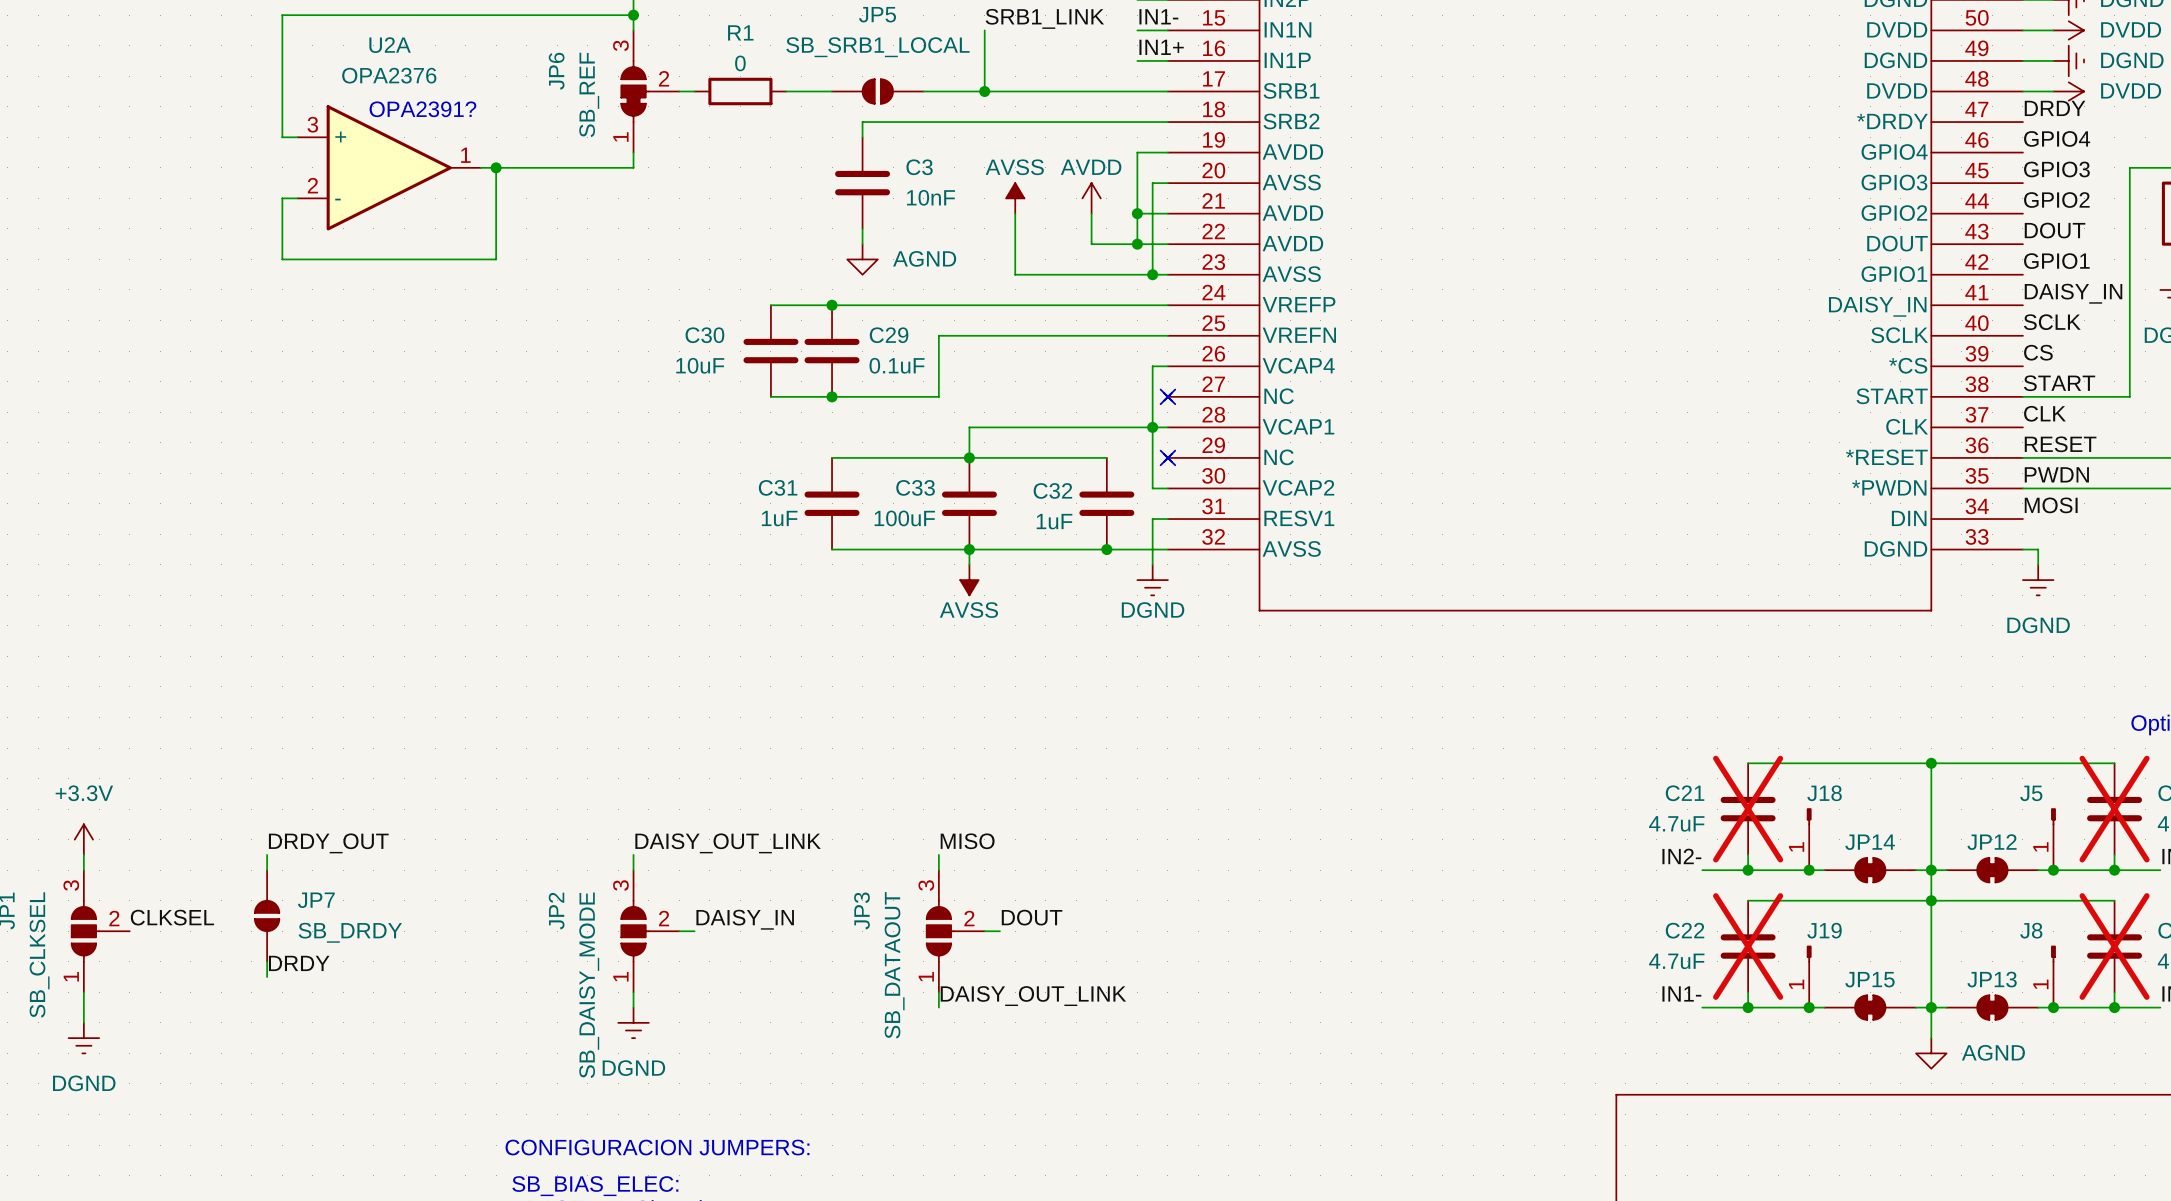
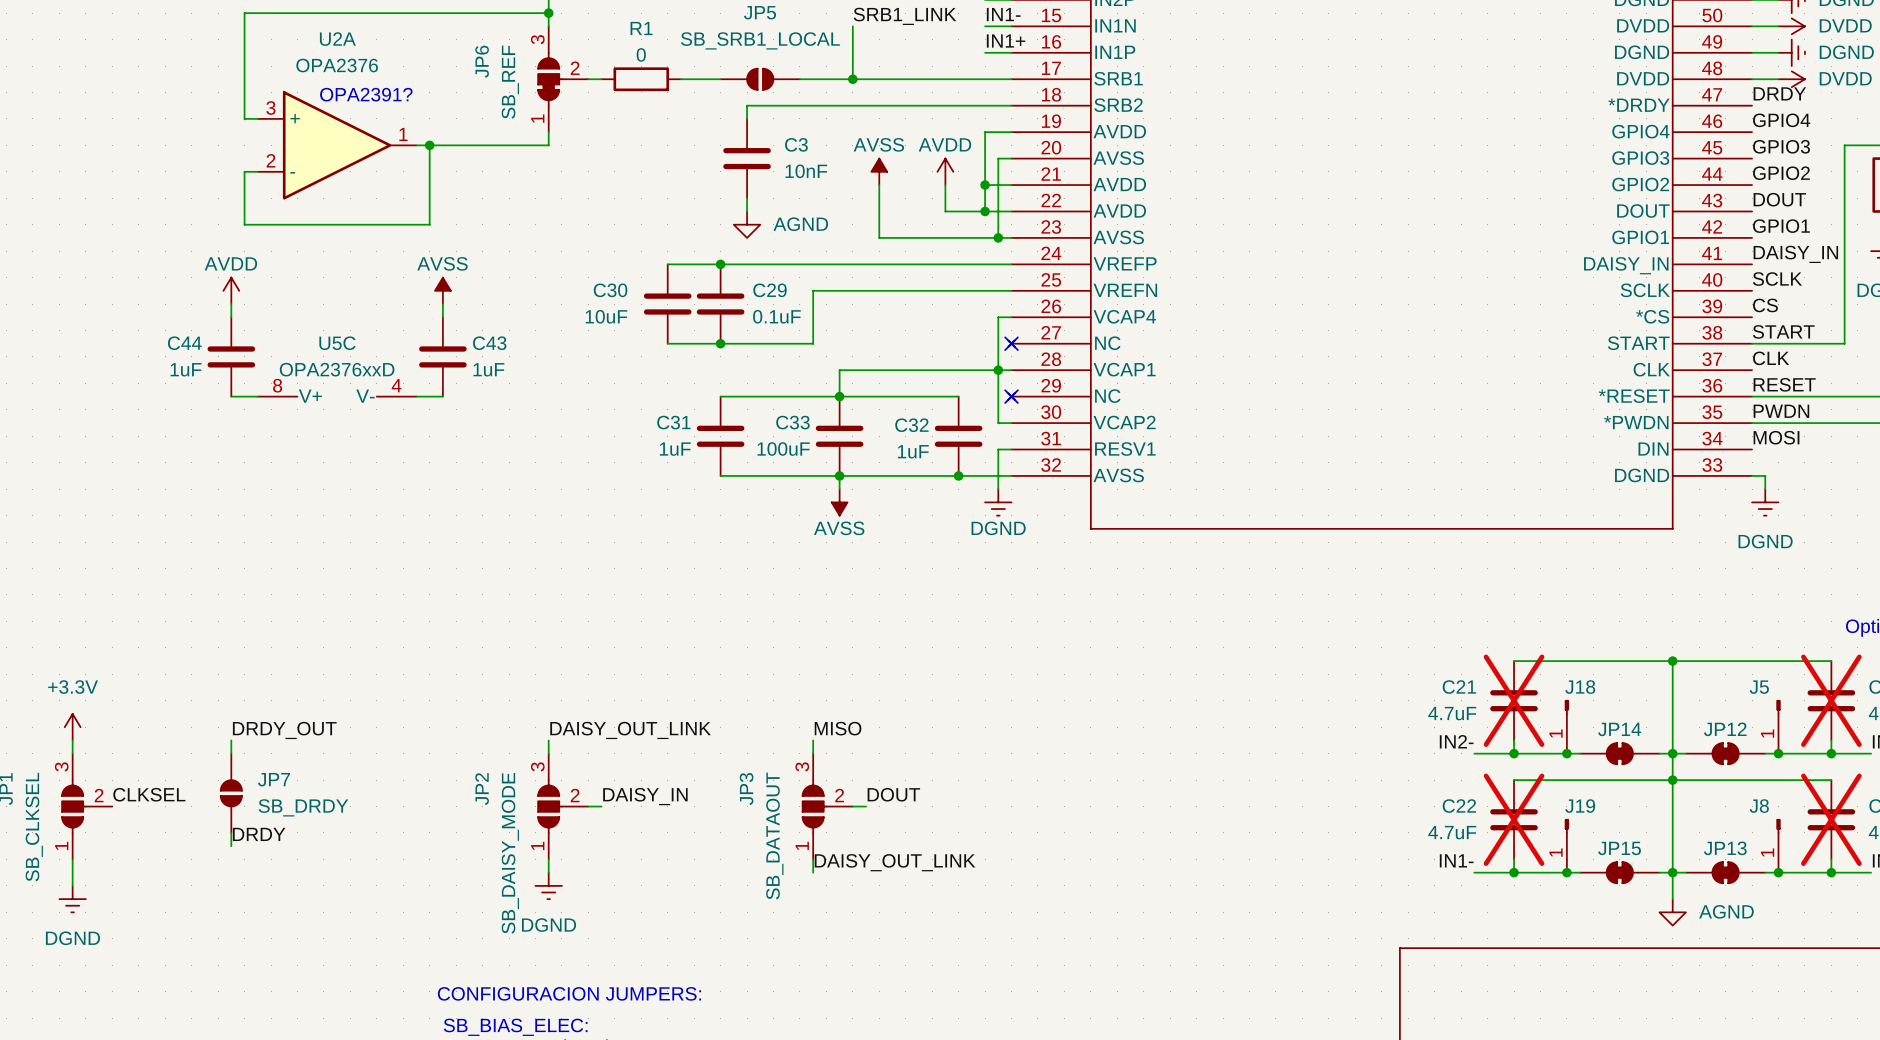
power symbol: none -> AVDD (231, 290)
power symbol: none -> AVSS (442, 290)
wire: none -> (231, 304) (231, 317)
wire: none -> (442, 304) (442, 317)
C44: none -> 1uF (231, 356)
C43: none -> 1uF (442, 356)
wire: none -> (231, 396) (257, 396)
U5C: none -> OPA2376xxD (337, 396)
wire: none -> (416, 396) (442, 396)

